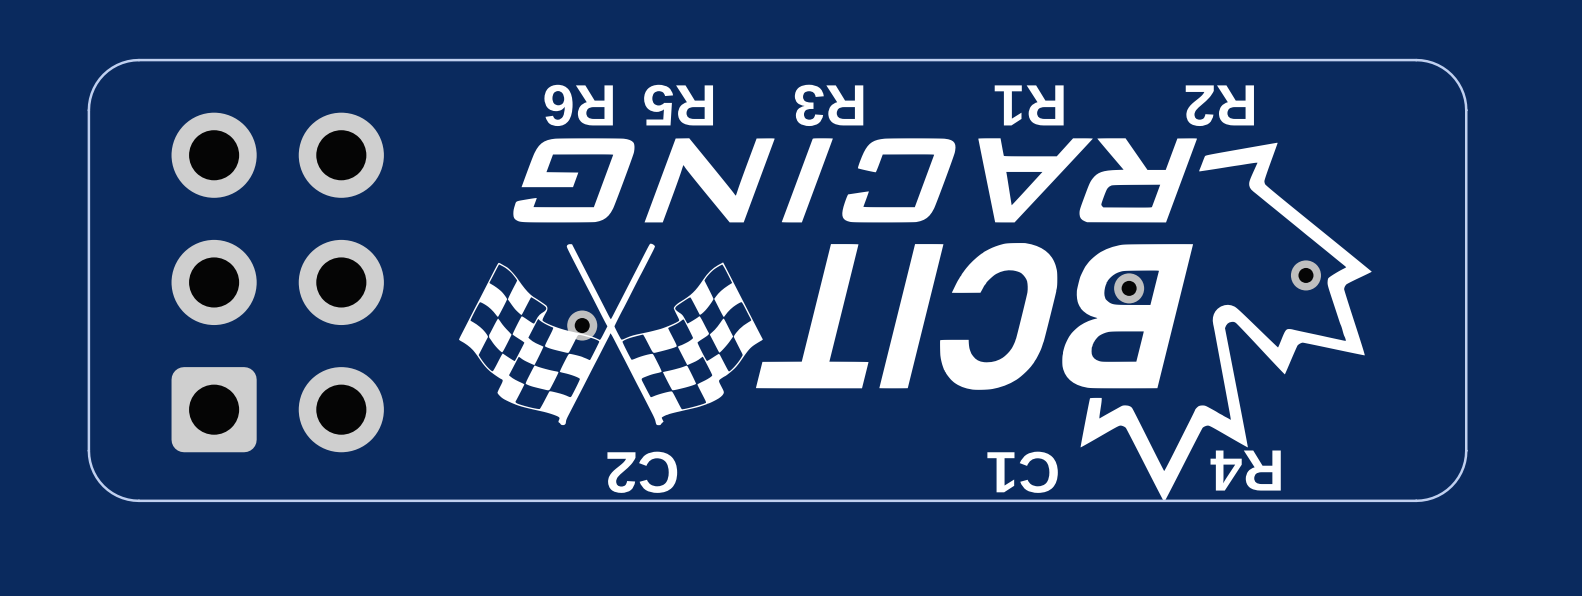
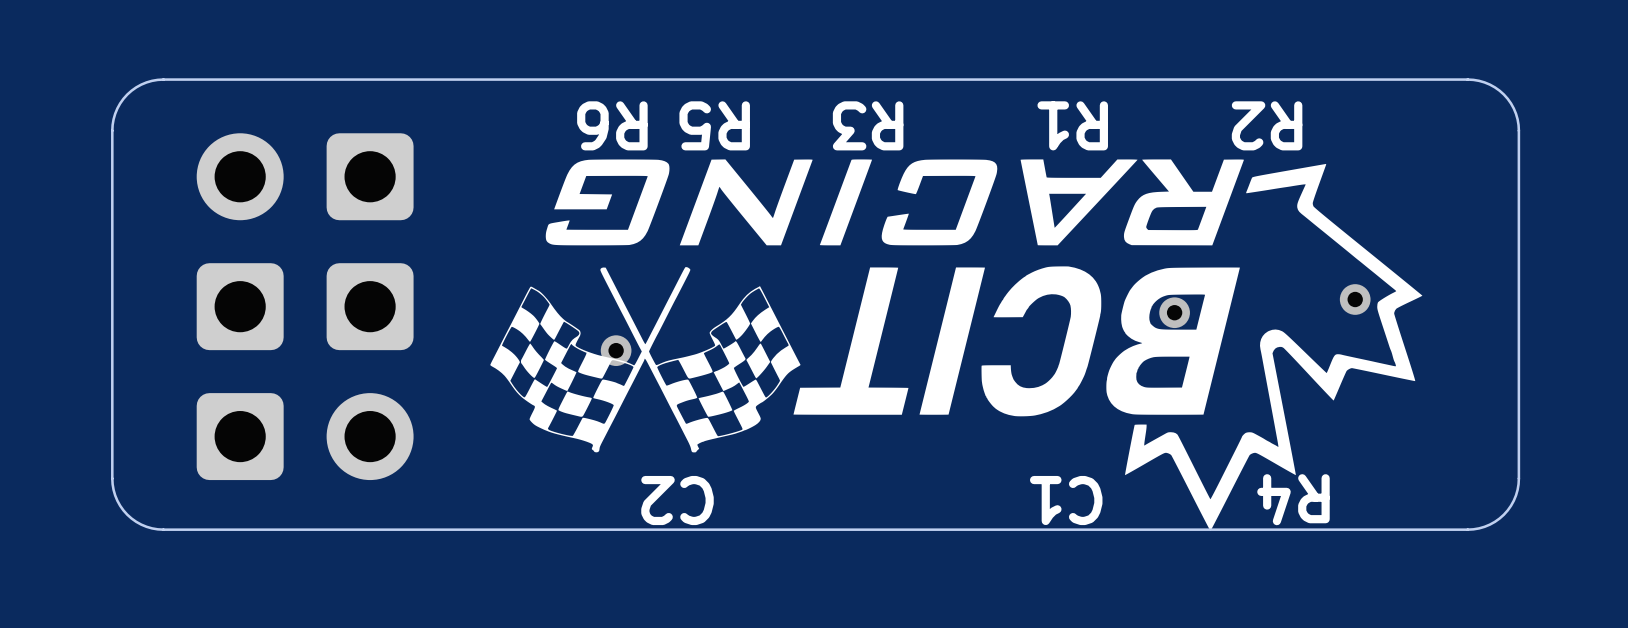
part footprint: [171, 112, 384, 453] -> [196, 133, 414, 481]

